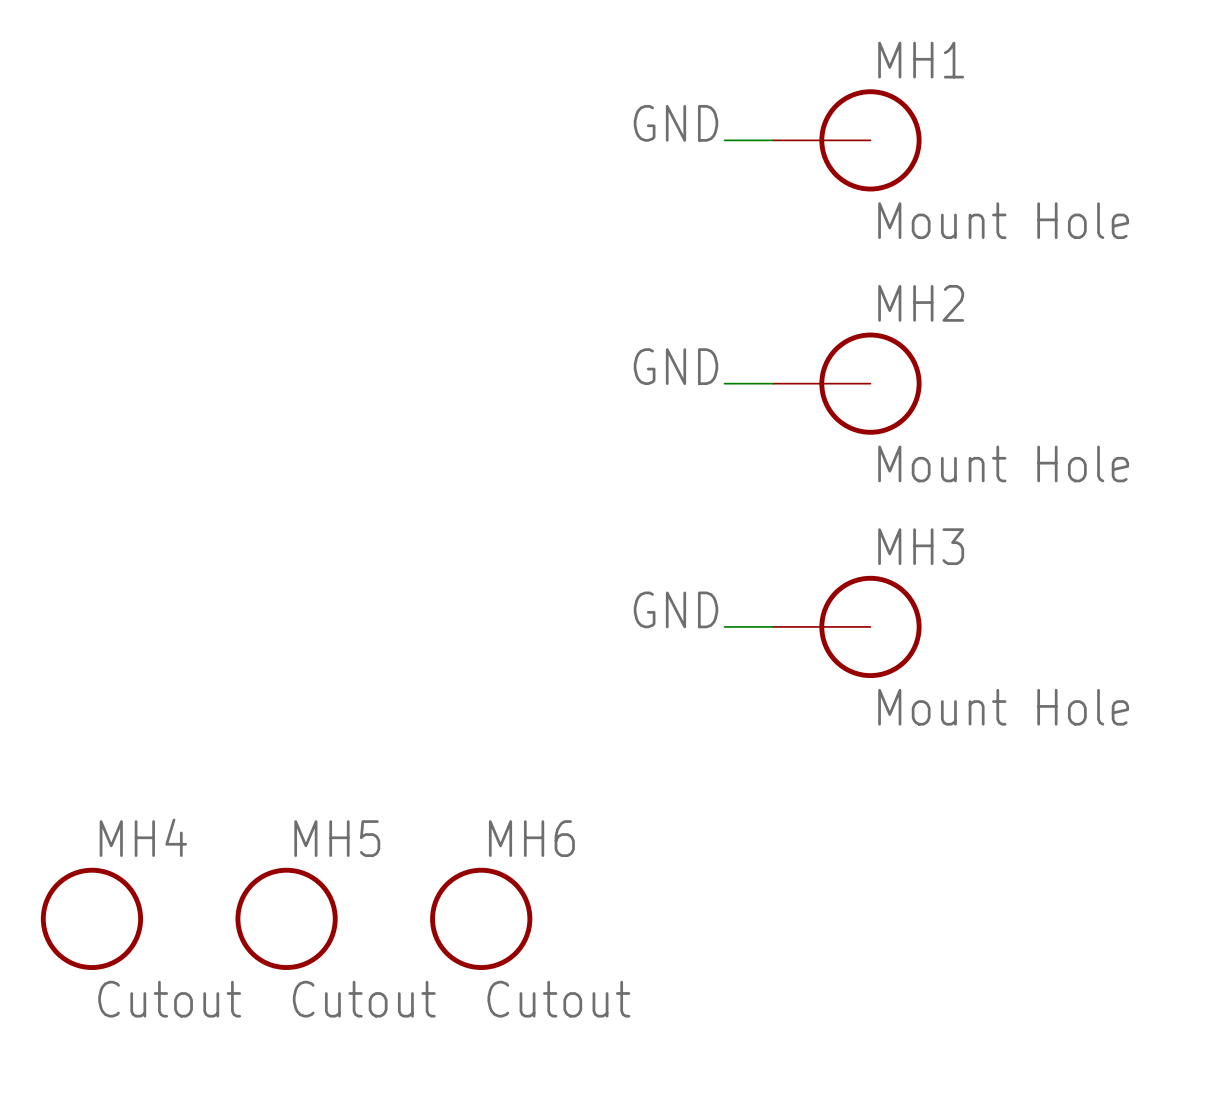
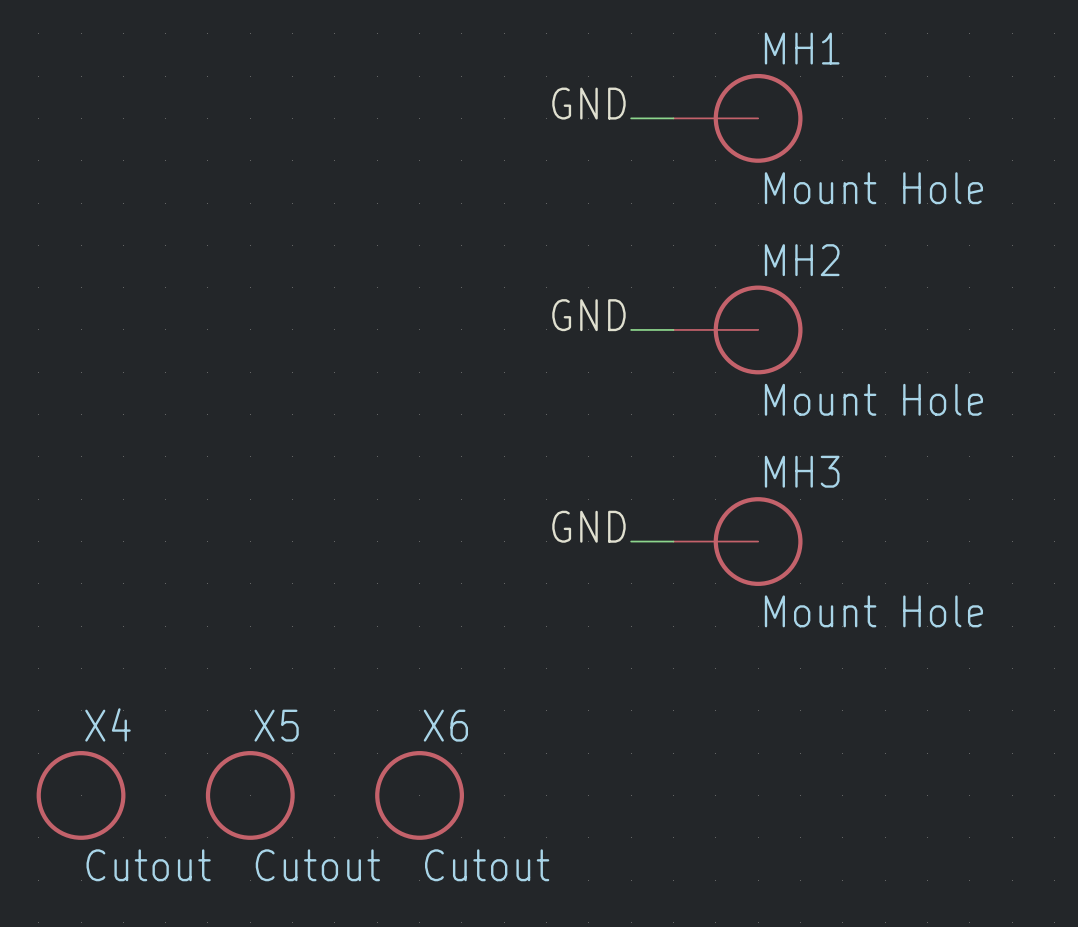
MH4 name: MH4 (143, 837) -> X4 (107, 724)
MH5 name: MH5 (337, 838) -> X5 (276, 725)
MH6 name: MH6 (531, 838) -> X6 (445, 725)

